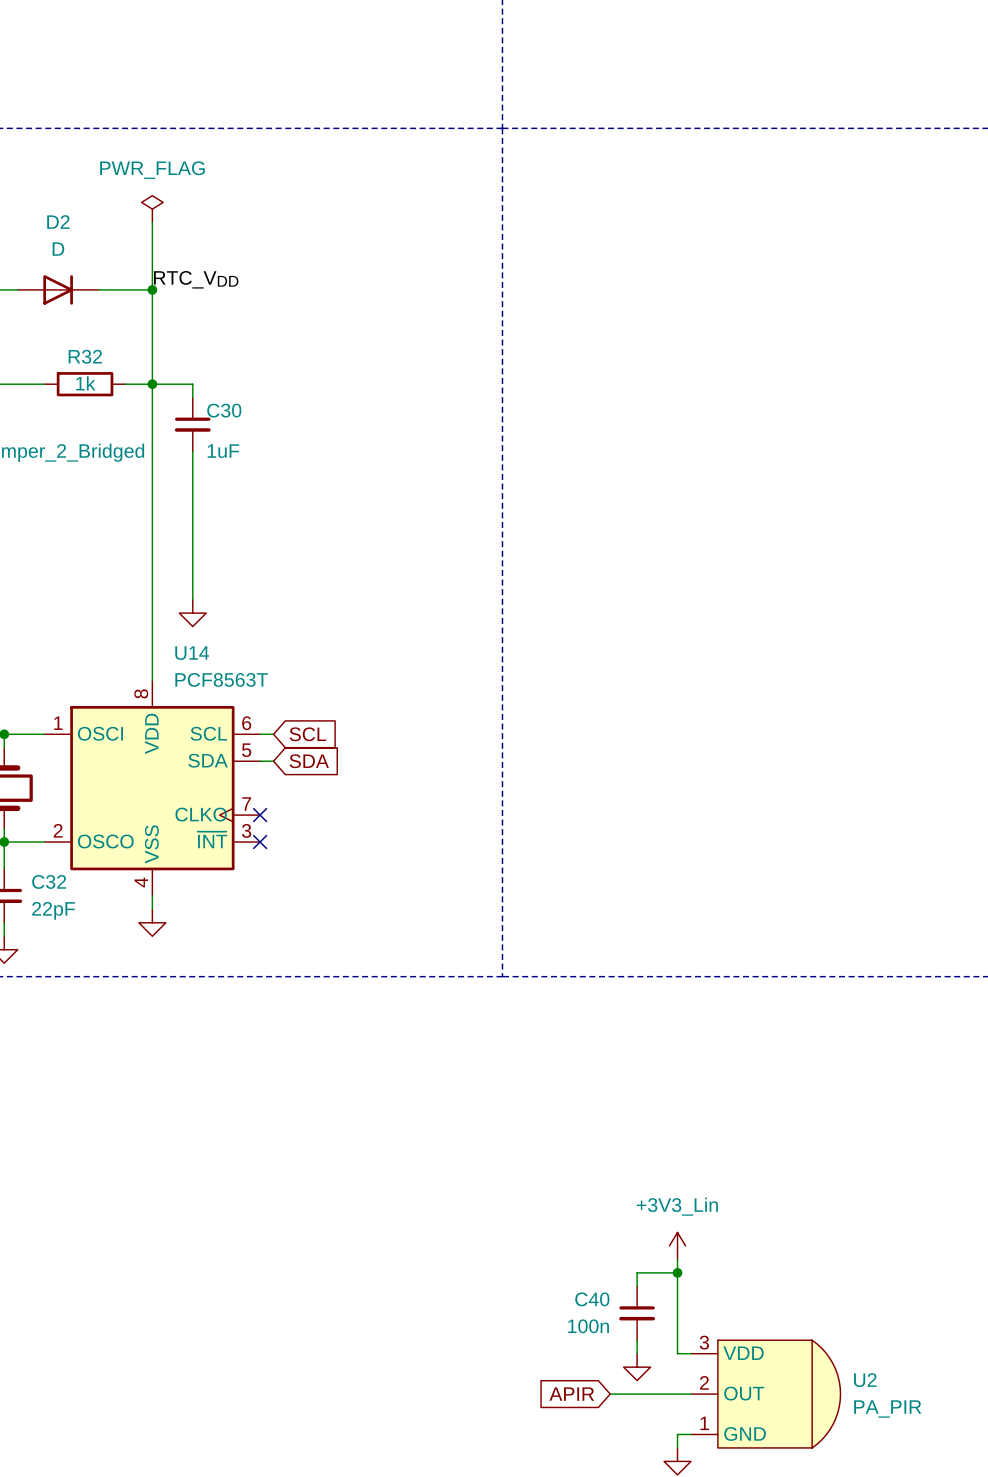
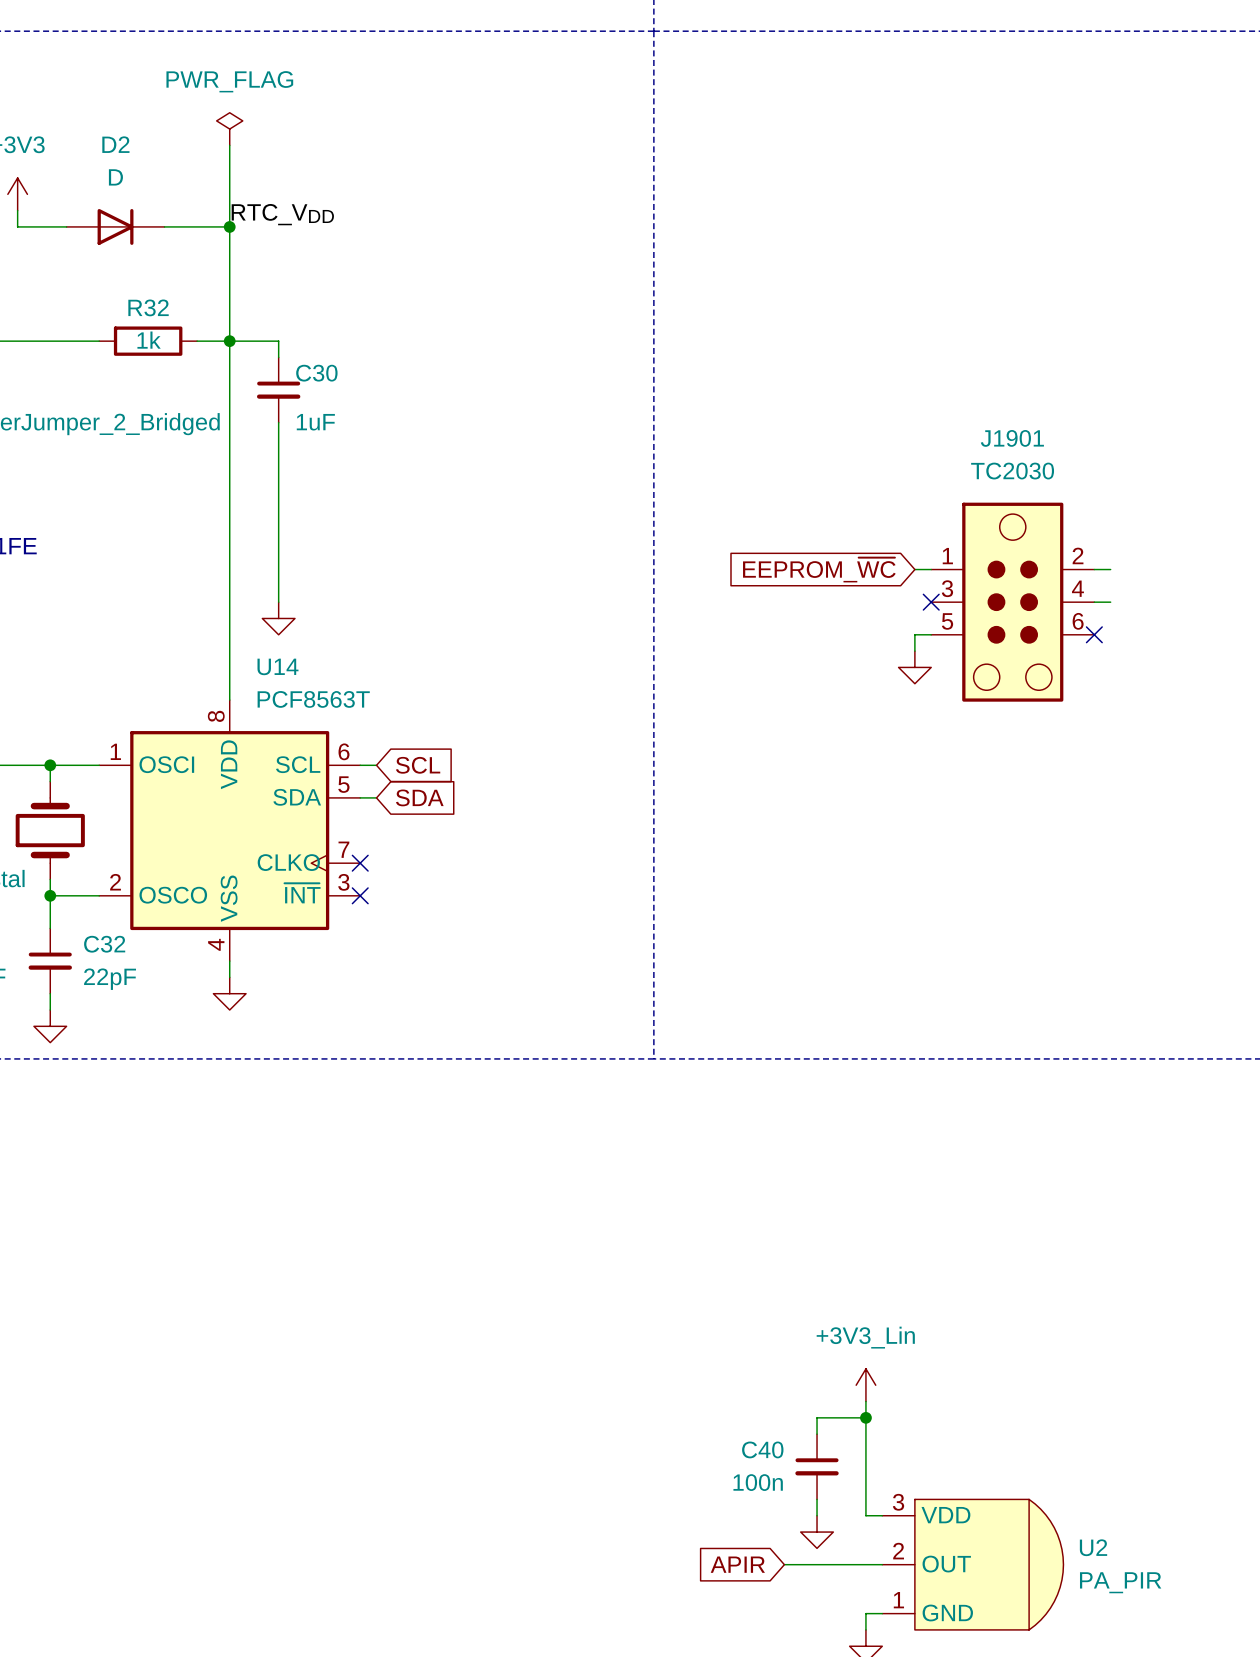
wire: none -> (914, 569) (931, 569)
wire: none -> (1094, 569) (1110, 569)
global label: none -> EEPROM_~{WC} (819, 570)
no-connect mark: none -> (931, 602)
J1901: none -> TC2030 (1012, 602)
wire: none -> (1094, 602) (1110, 602)
wire: none -> (931, 634) (914, 634) (914, 651)
no-connect mark: none -> (1094, 634)
power symbol: none -> (914, 667)

